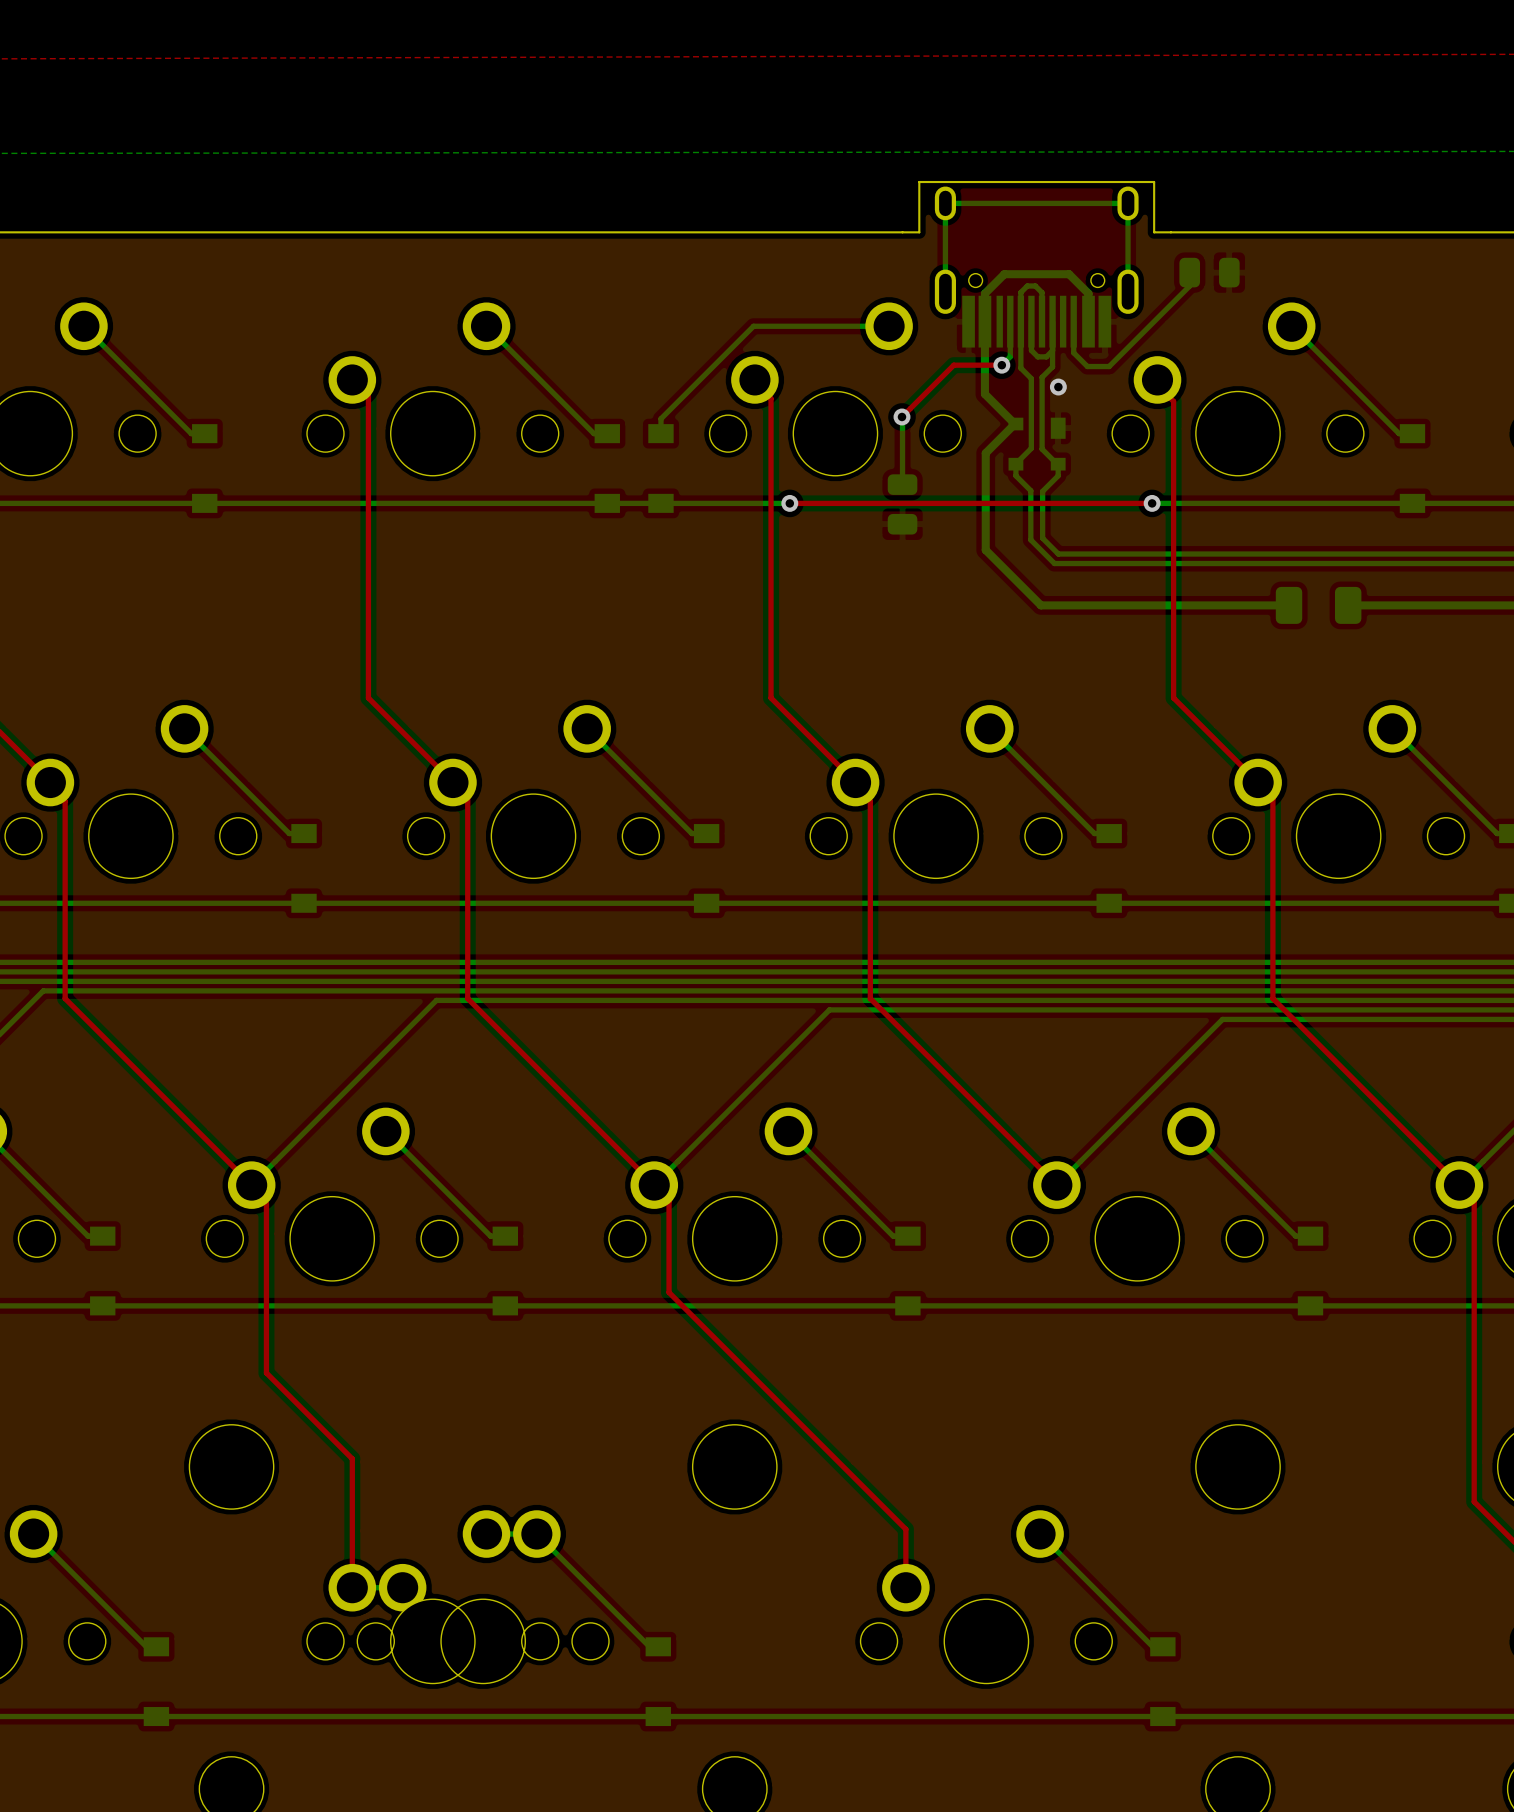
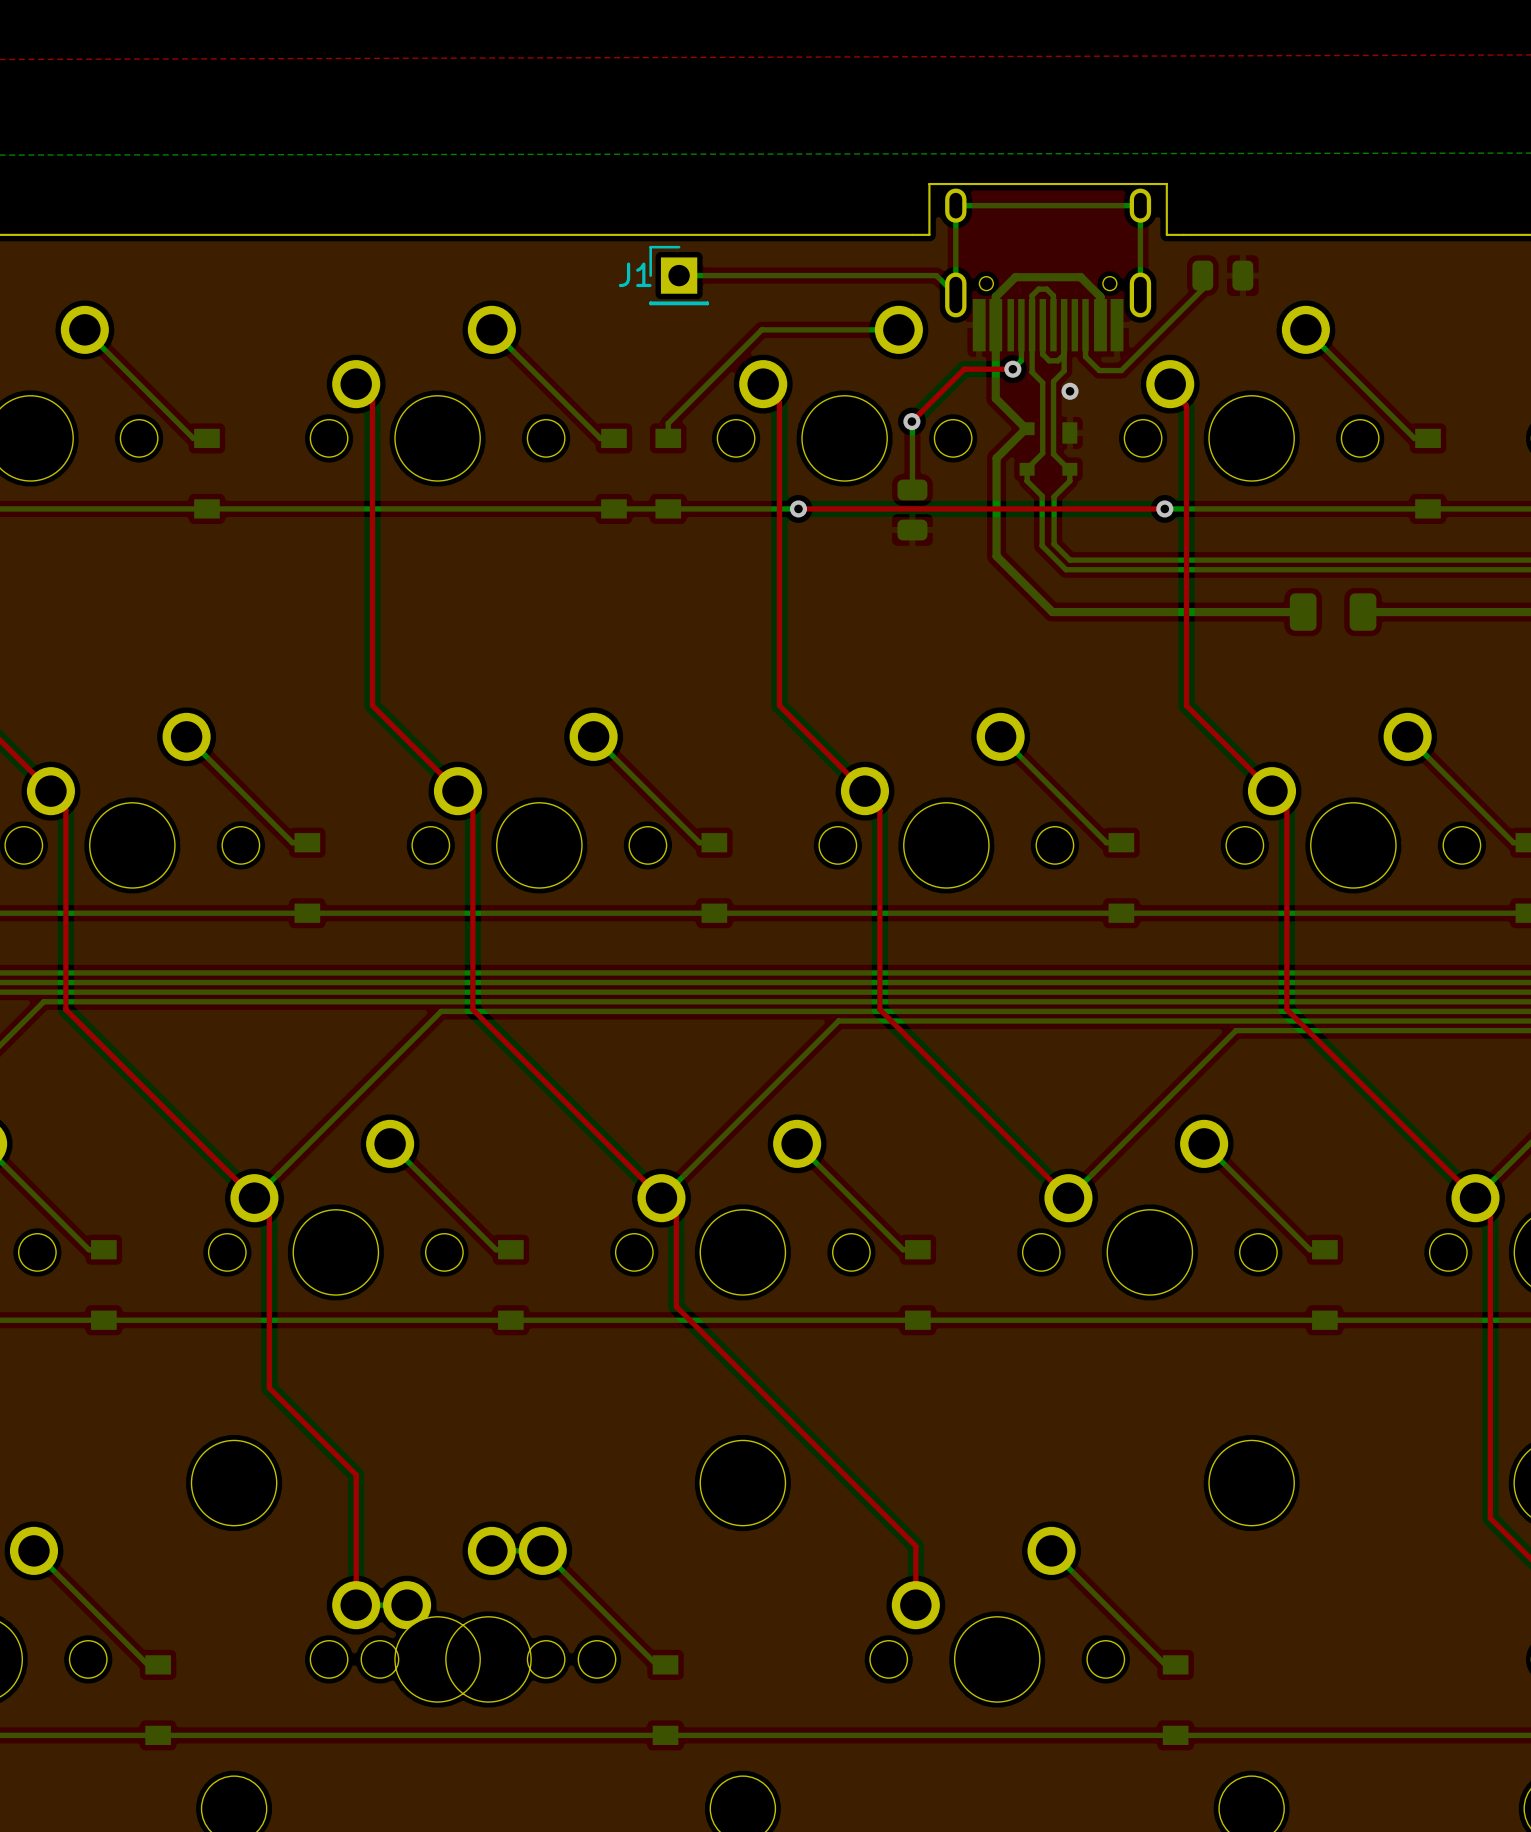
bottom track: none -> (679, 275) (936, 275) (955, 294)
J1: none -> (679, 275)

